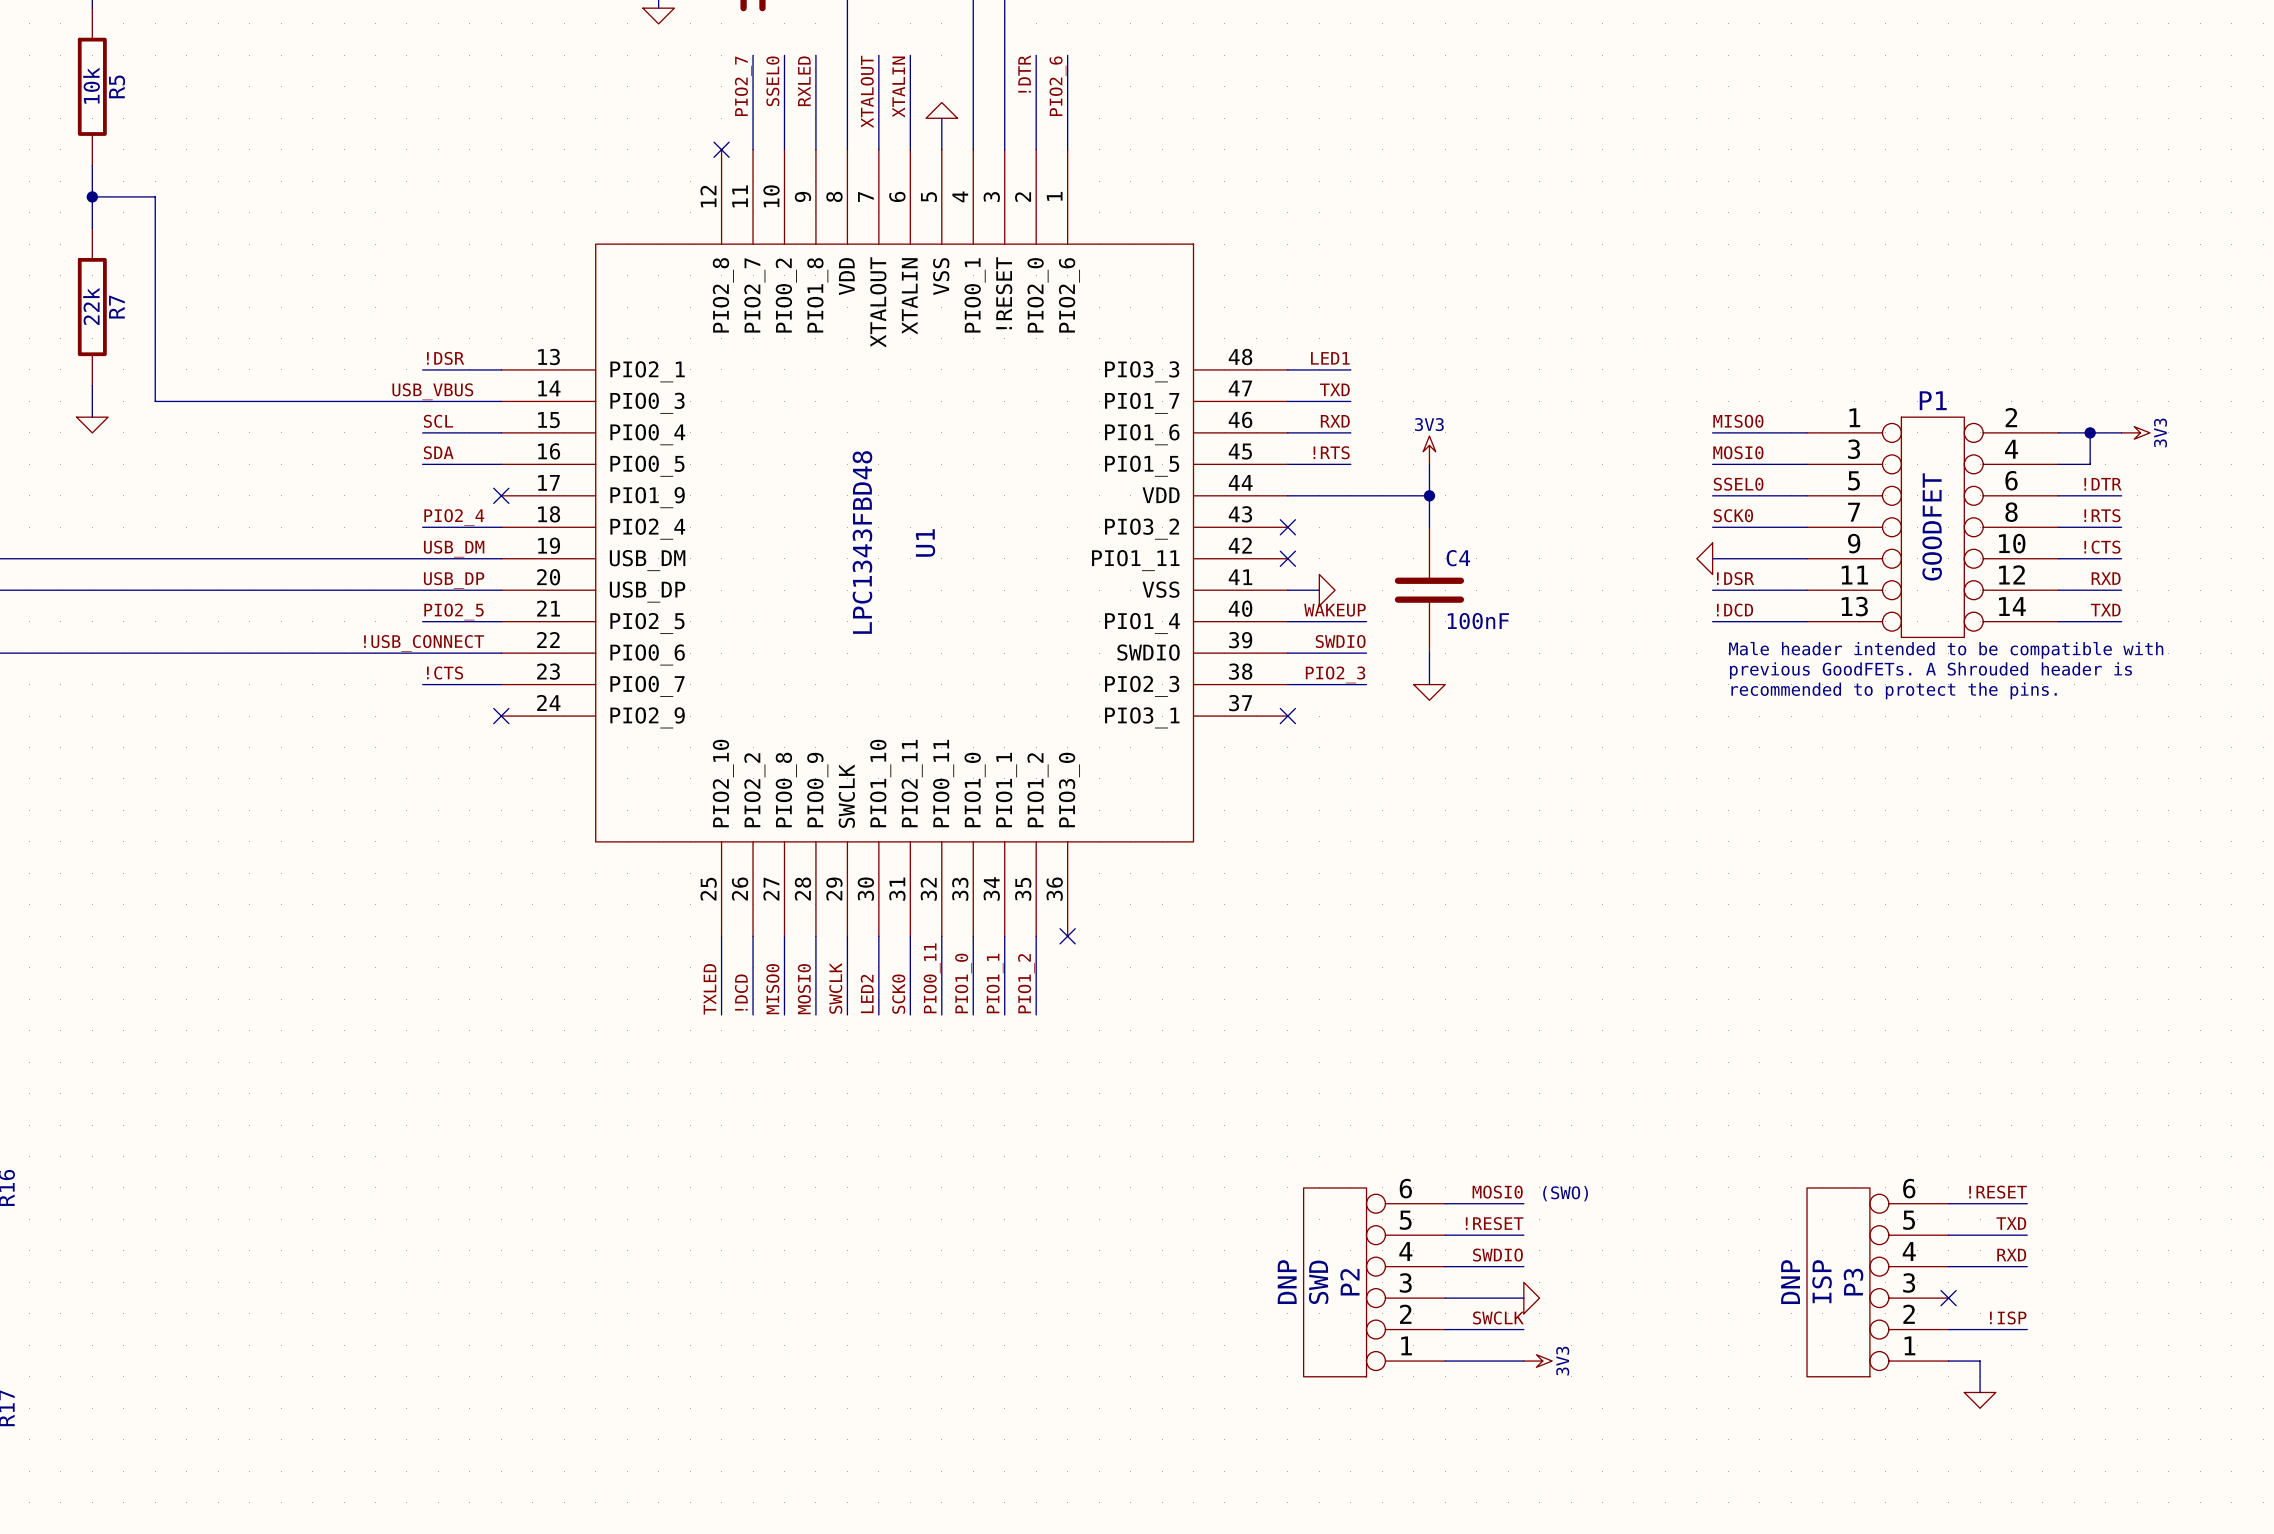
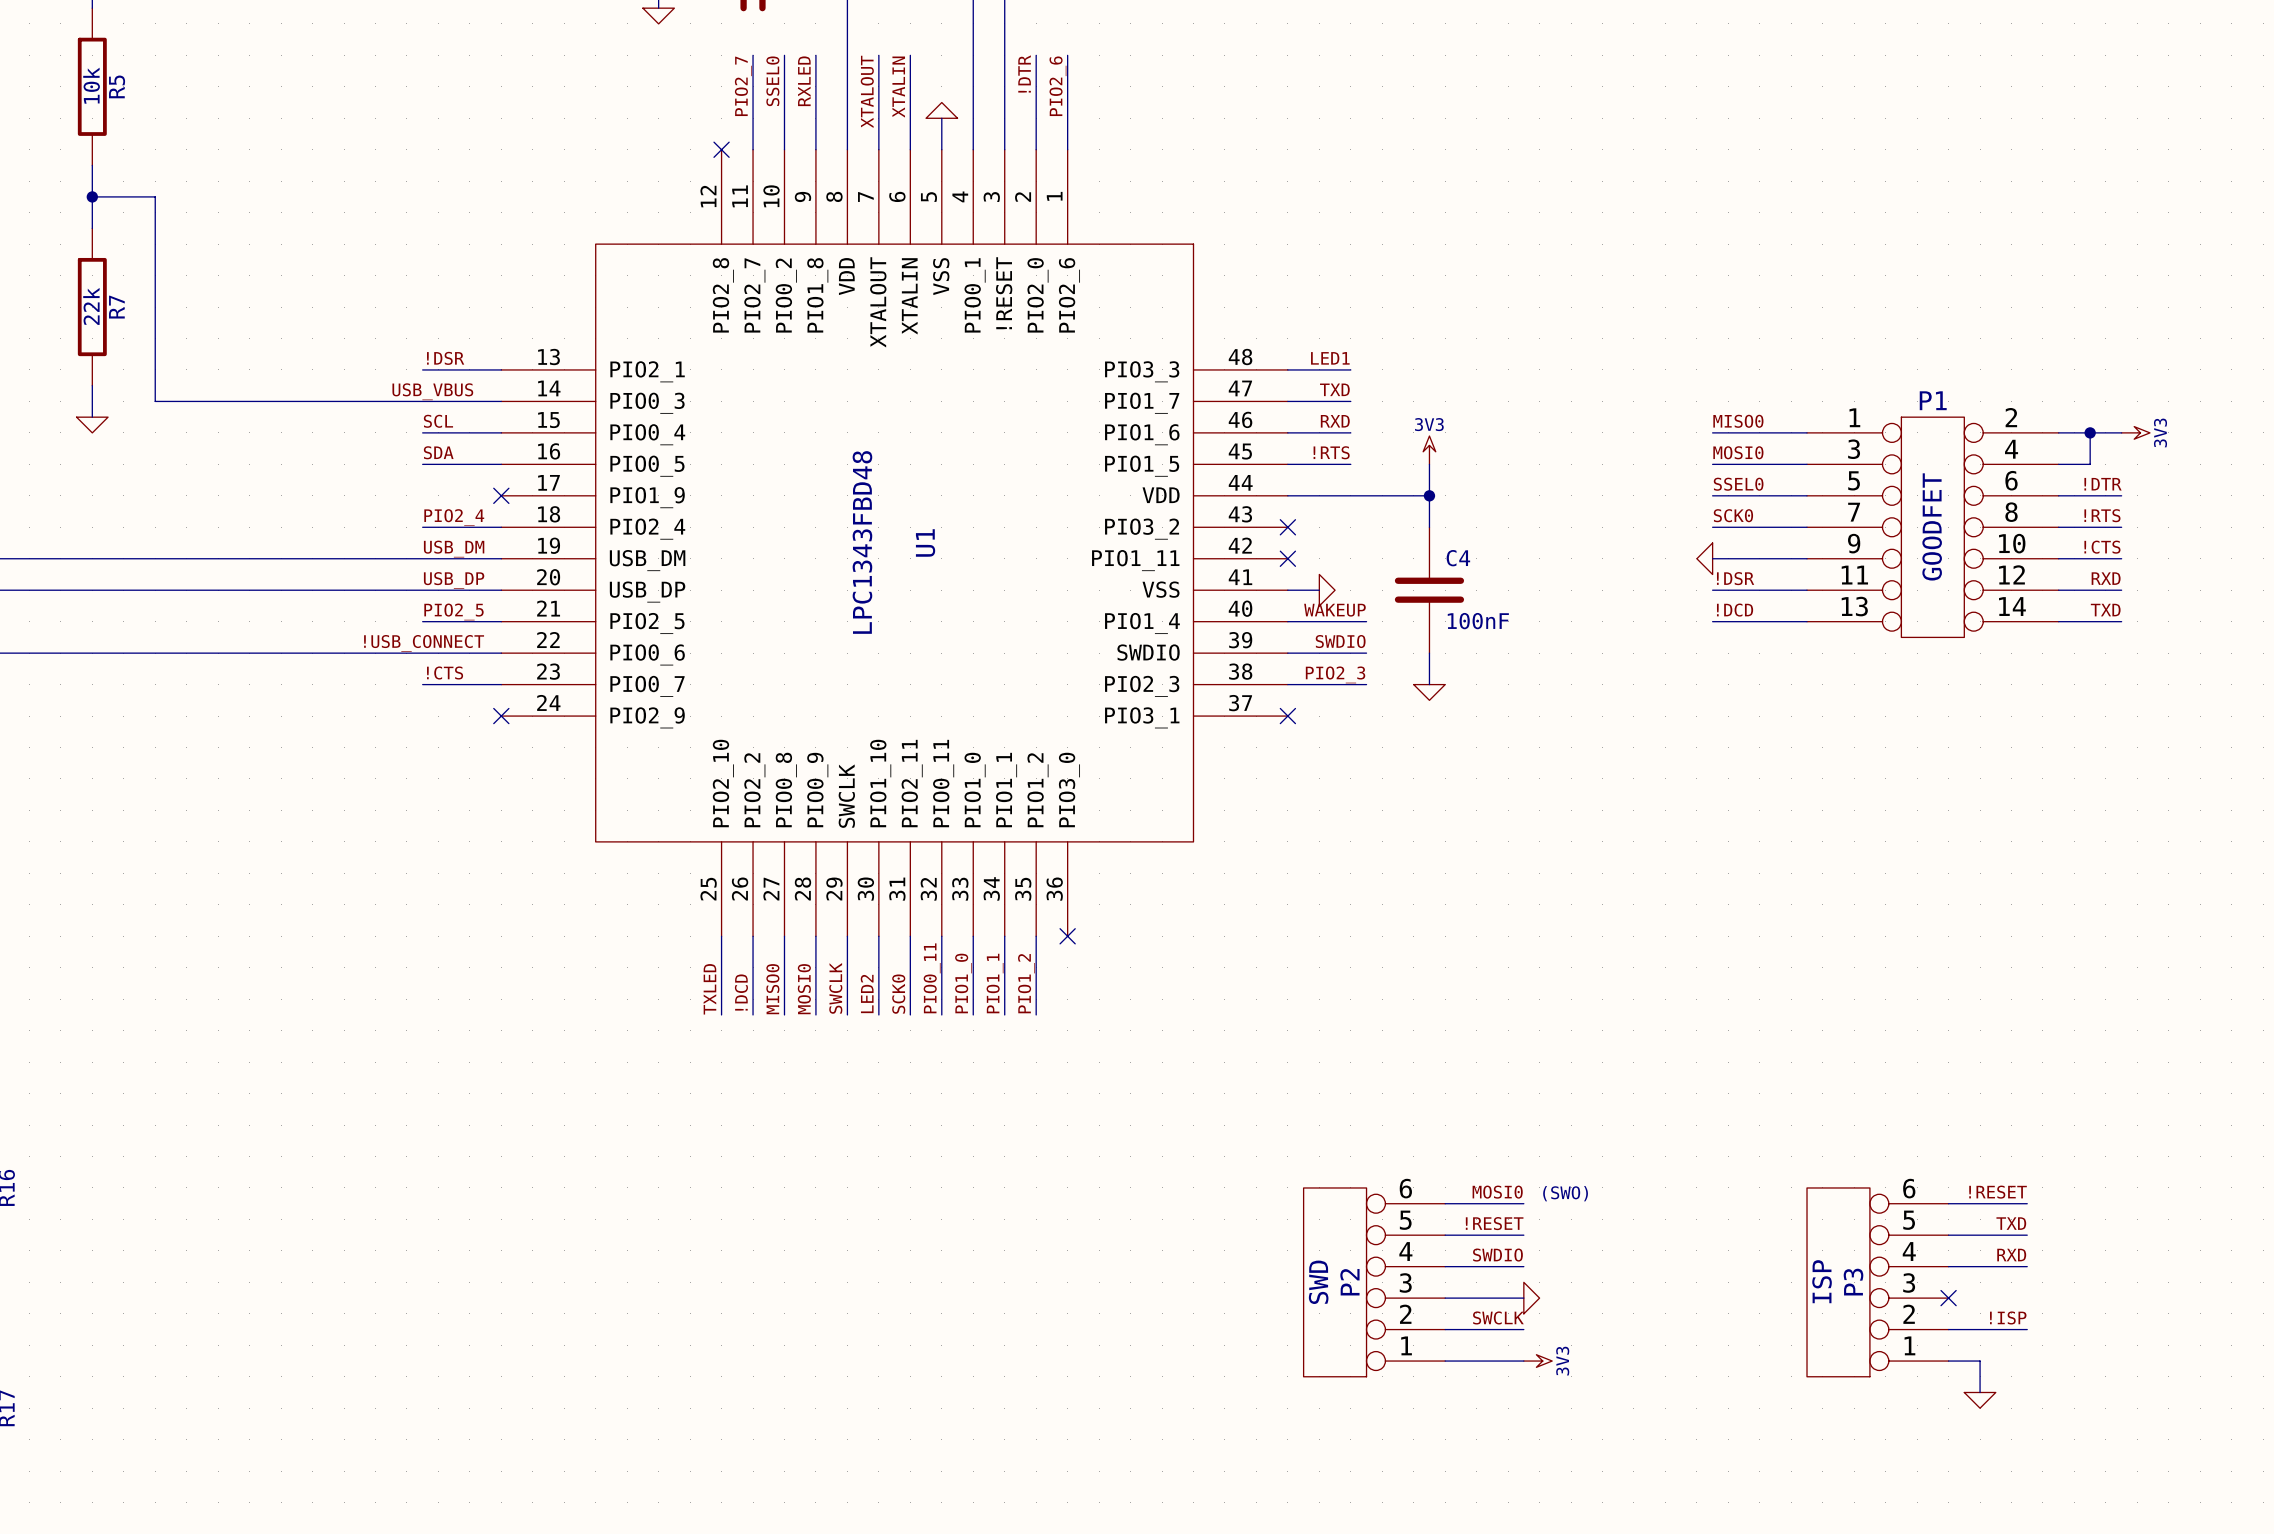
text: Male header intended to be compatible with (1946, 650) -> none
text: previous GoodFETs. A Shrouded header is (1930, 670) -> none
text: recommended to protect the pins. (1894, 690) -> none
P2 text: DNP (1287, 1282) -> none
P3 text: DNP (1790, 1282) -> none

